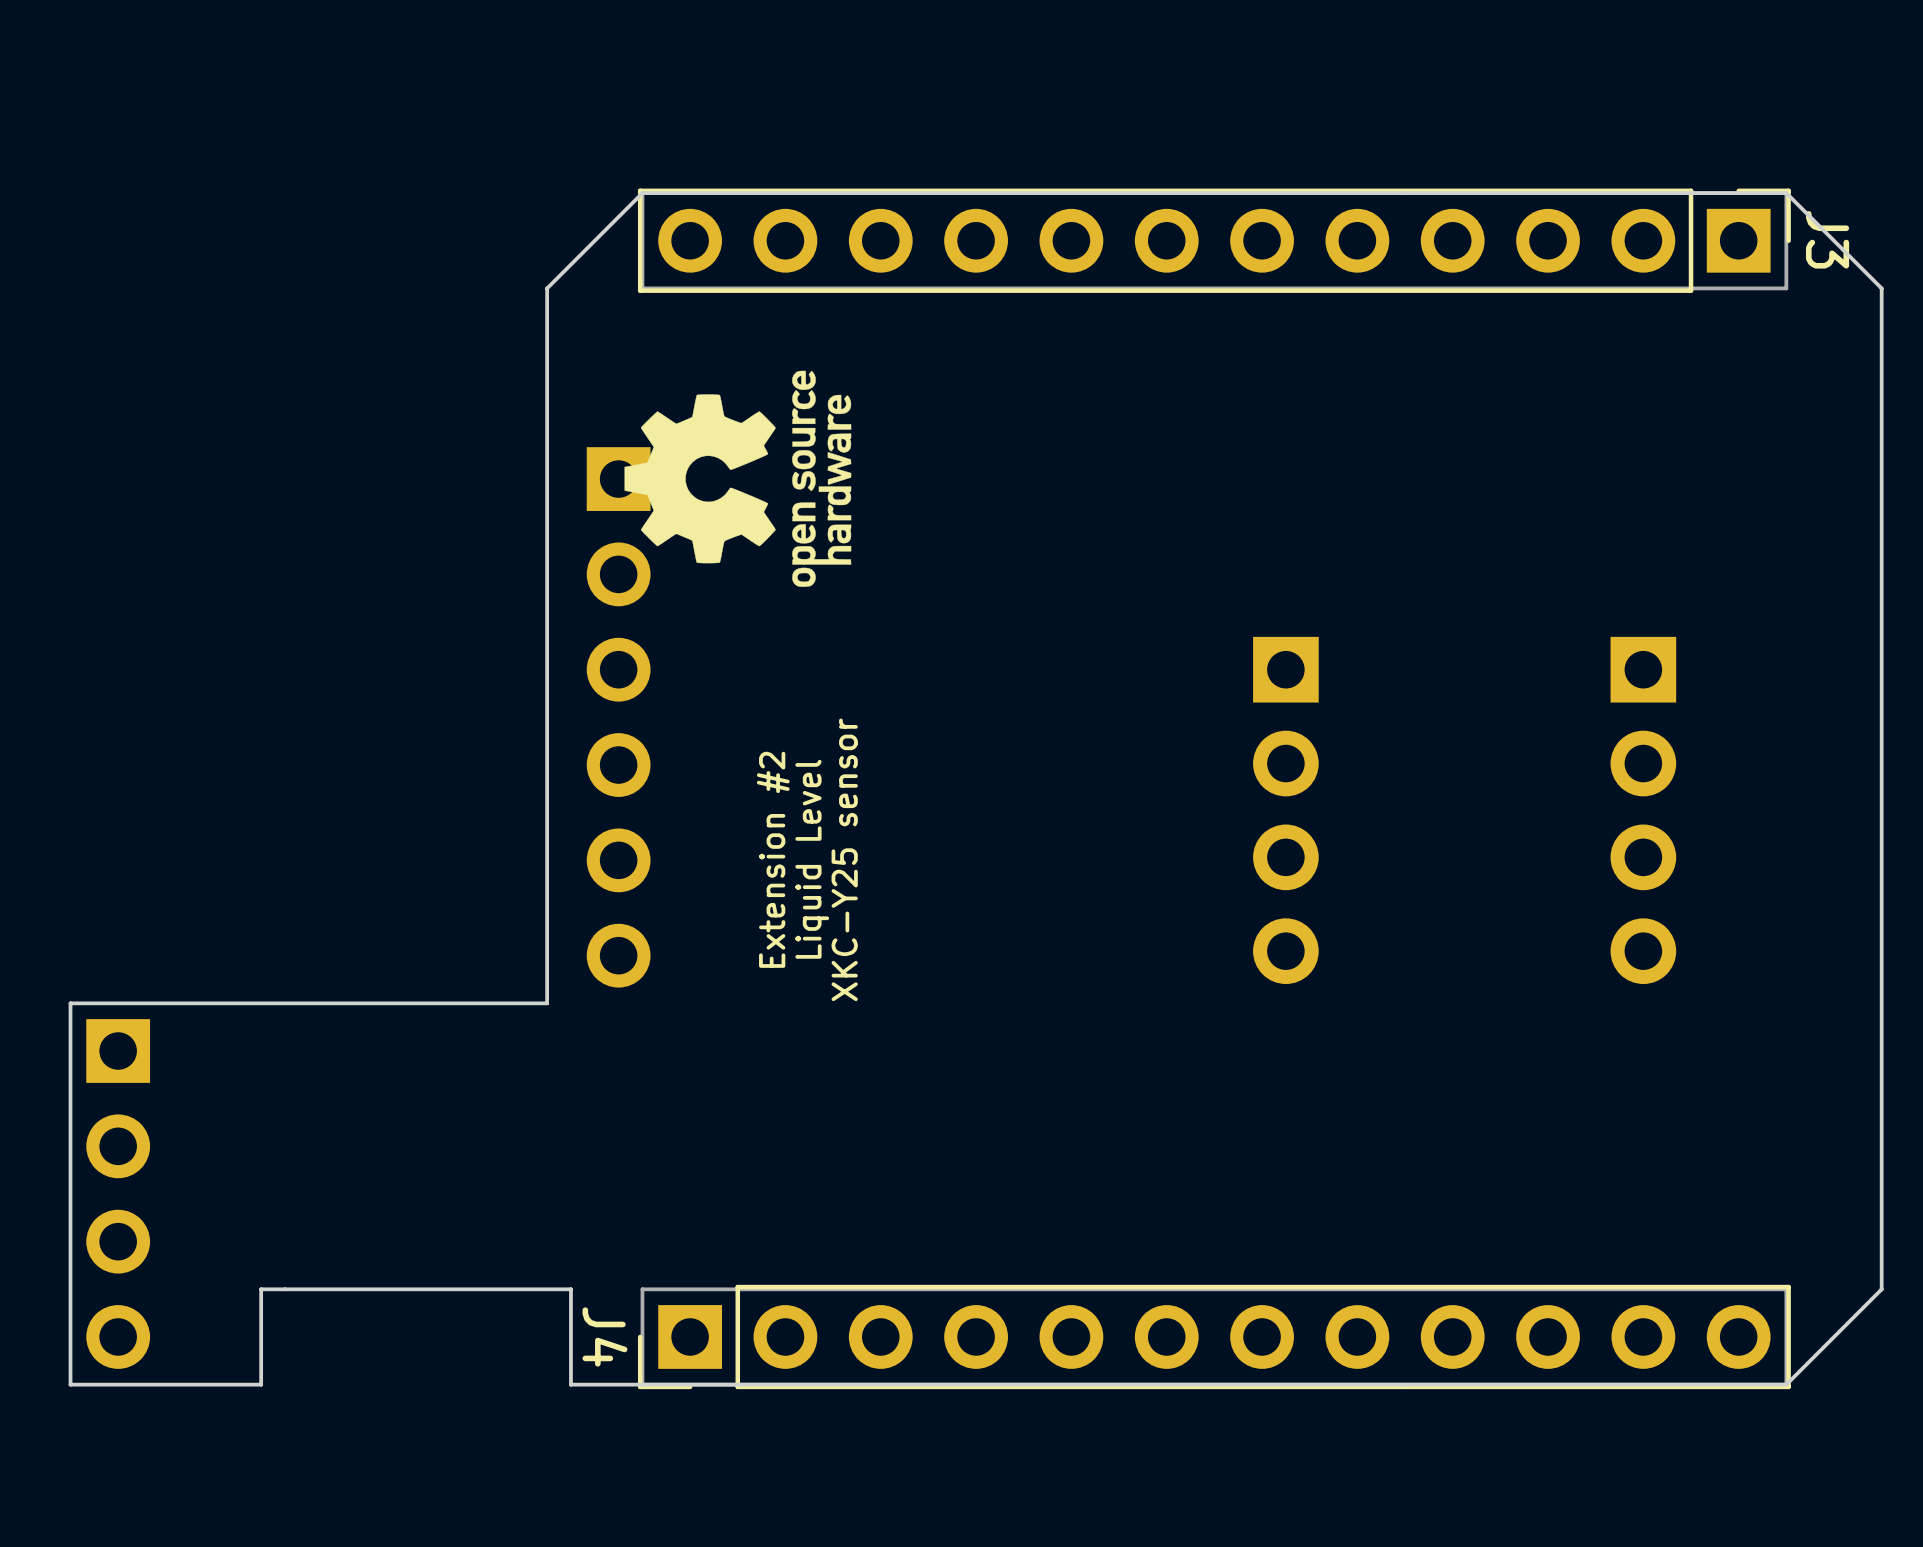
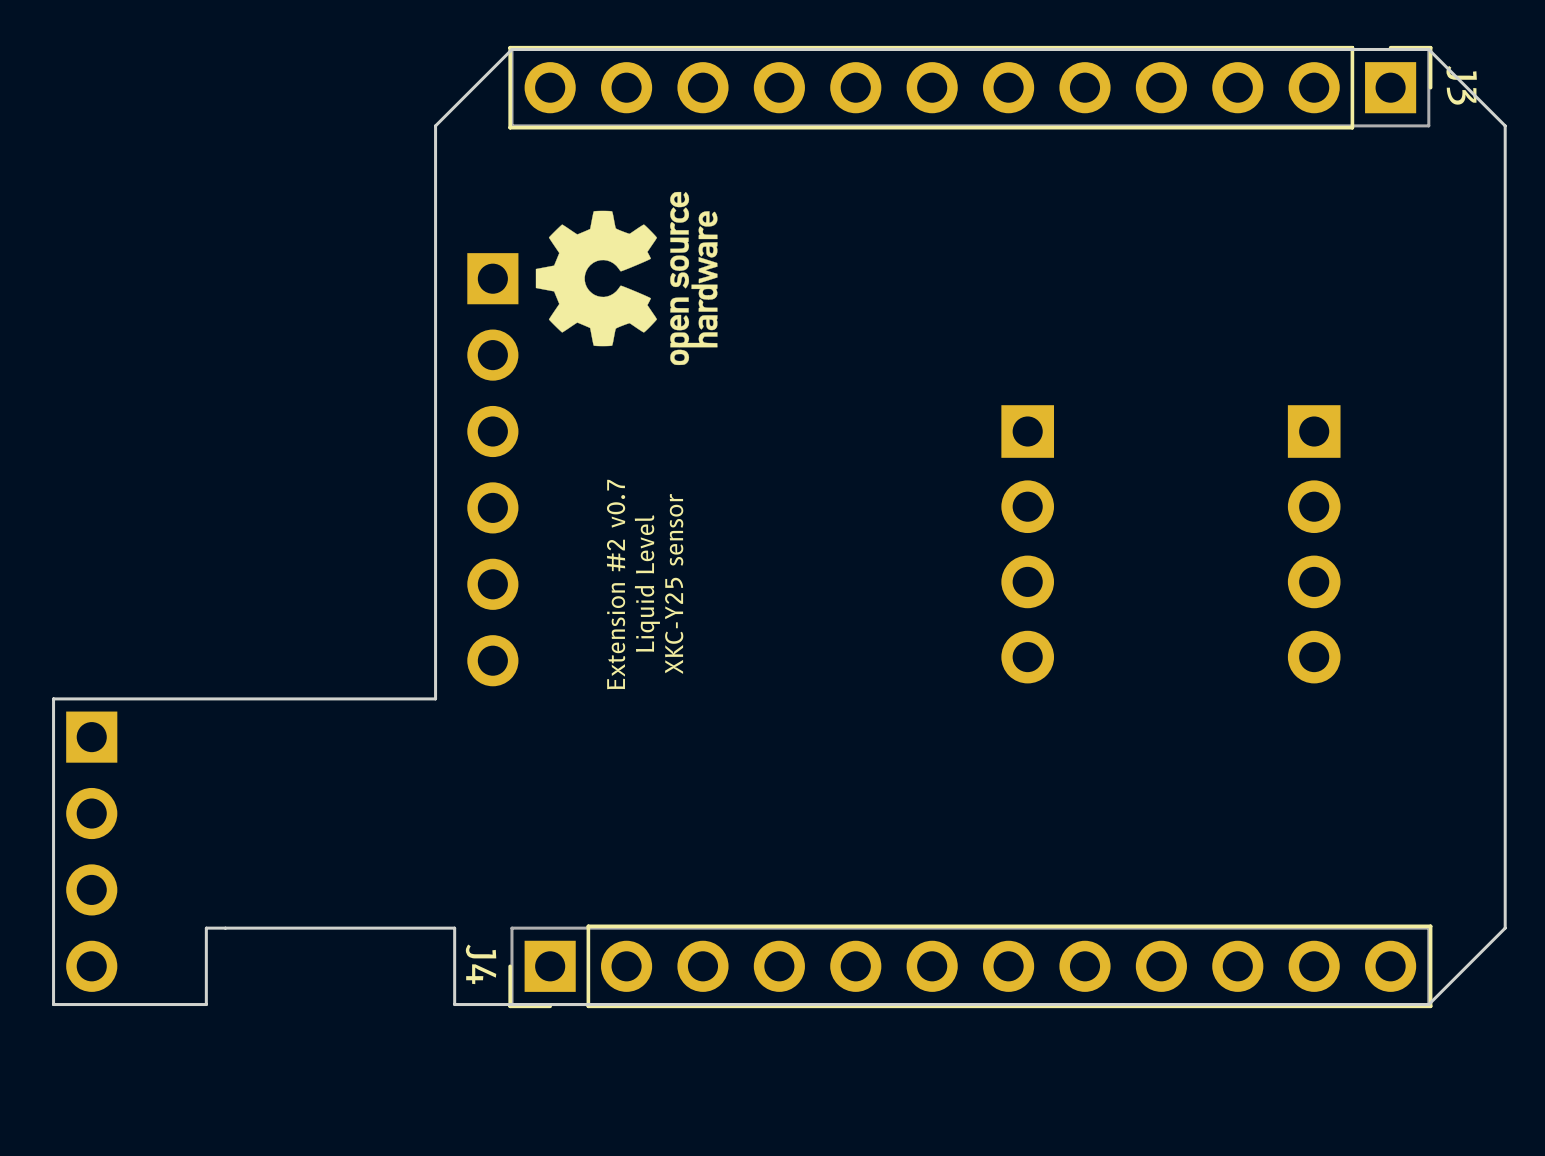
drawing position: (737, 478) -> (626, 278)
text: Extension #2 (773, 859) -> Extension #2 v0.7 (616, 584)

